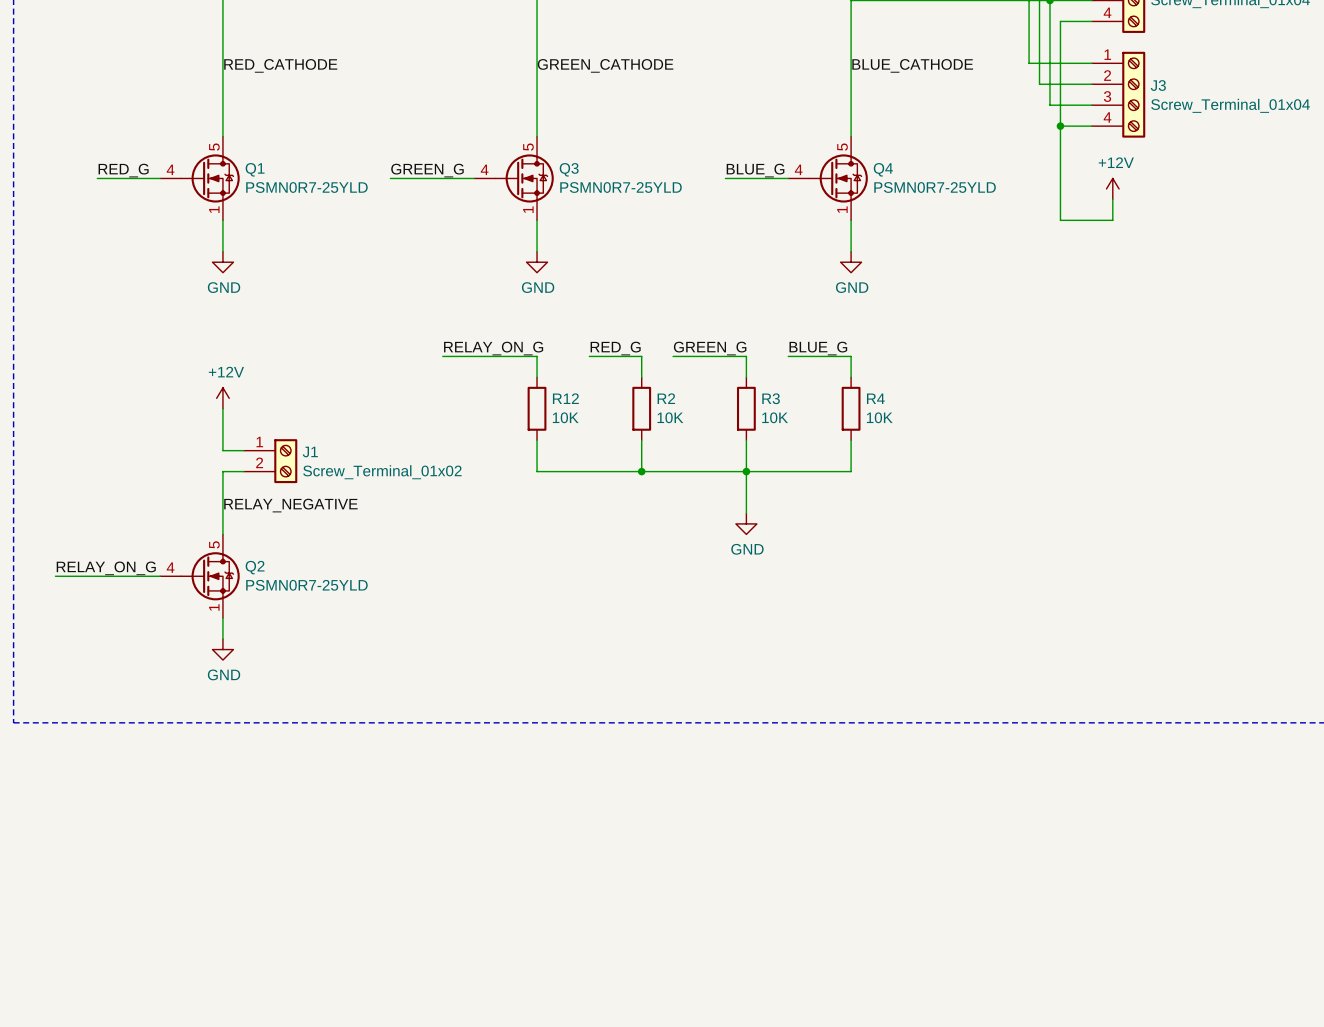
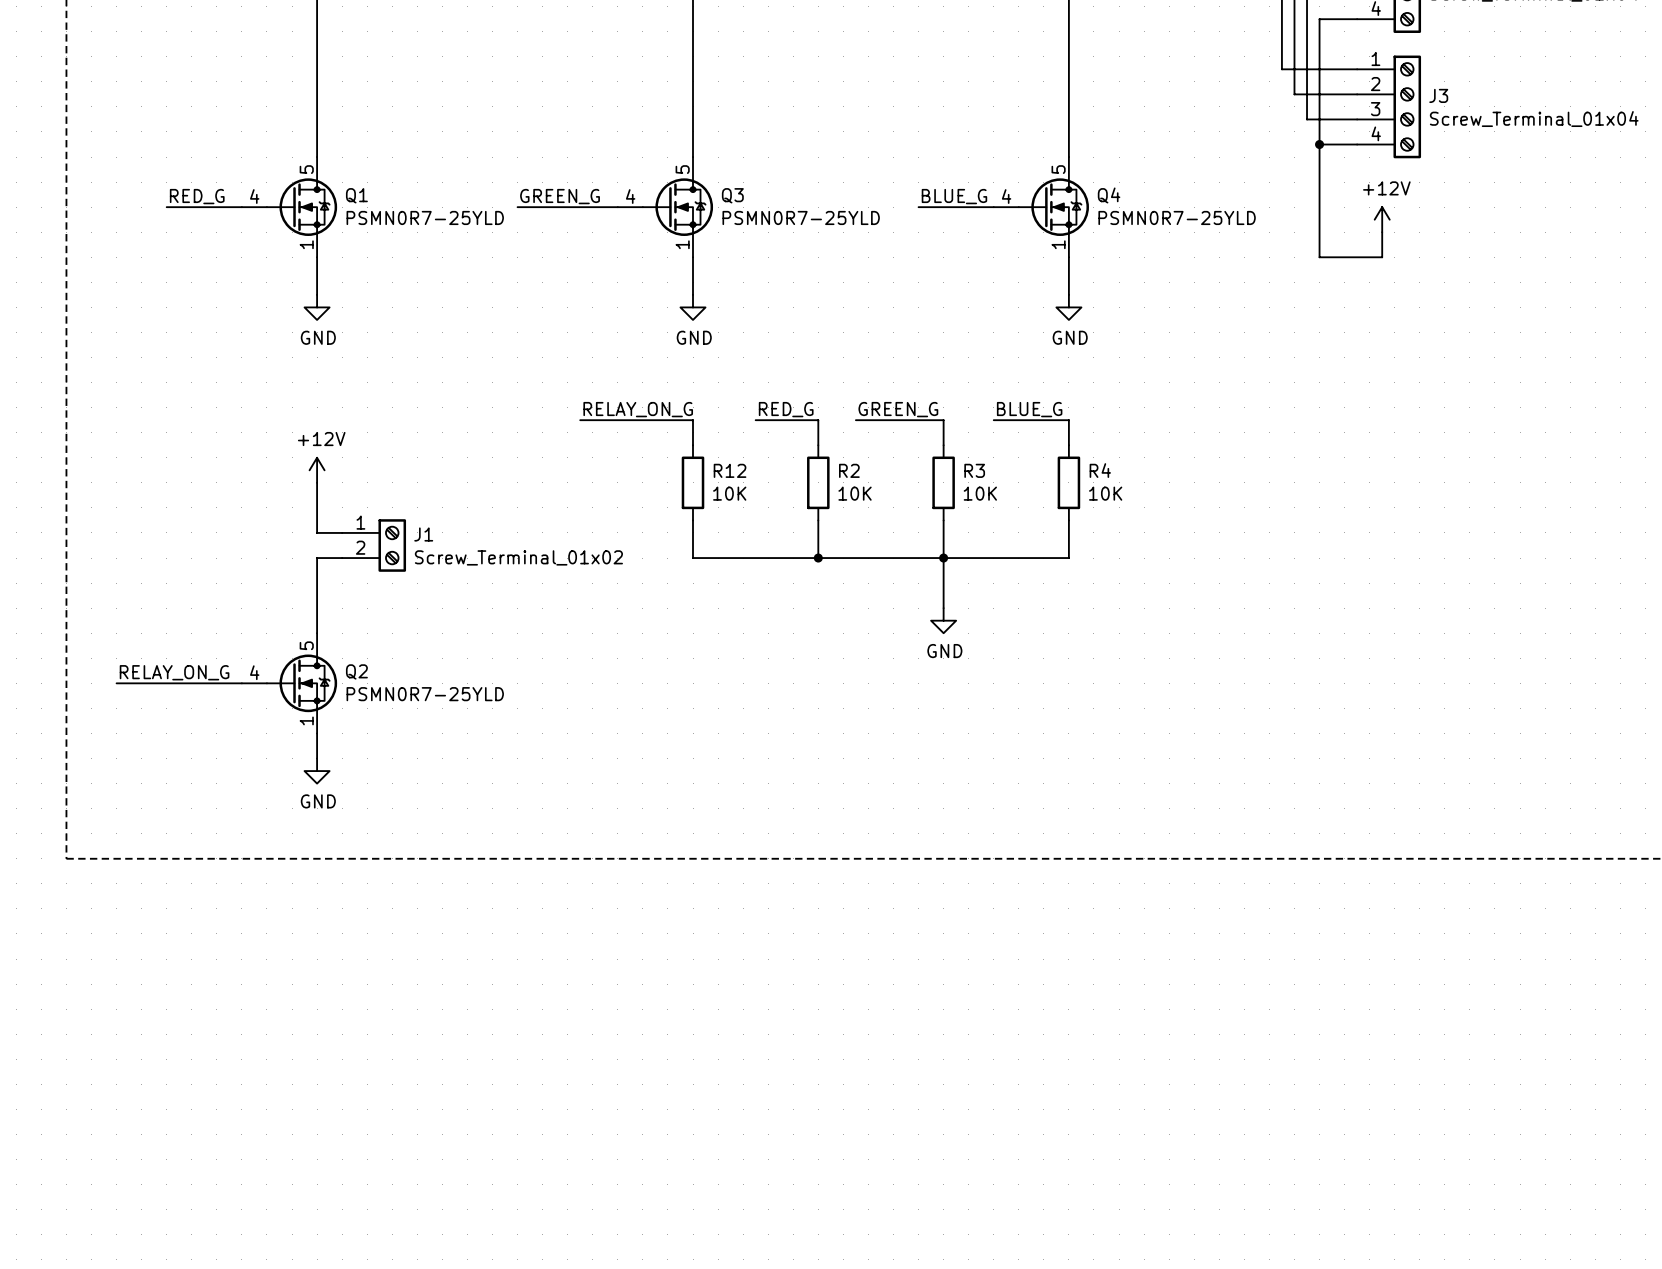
label: RED_CATHODE (280, 65) -> none
label: GREEN_CATHODE (605, 65) -> none
label: BLUE_CATHODE (912, 65) -> none
label: RELAY_NEGATIVE (290, 505) -> none

